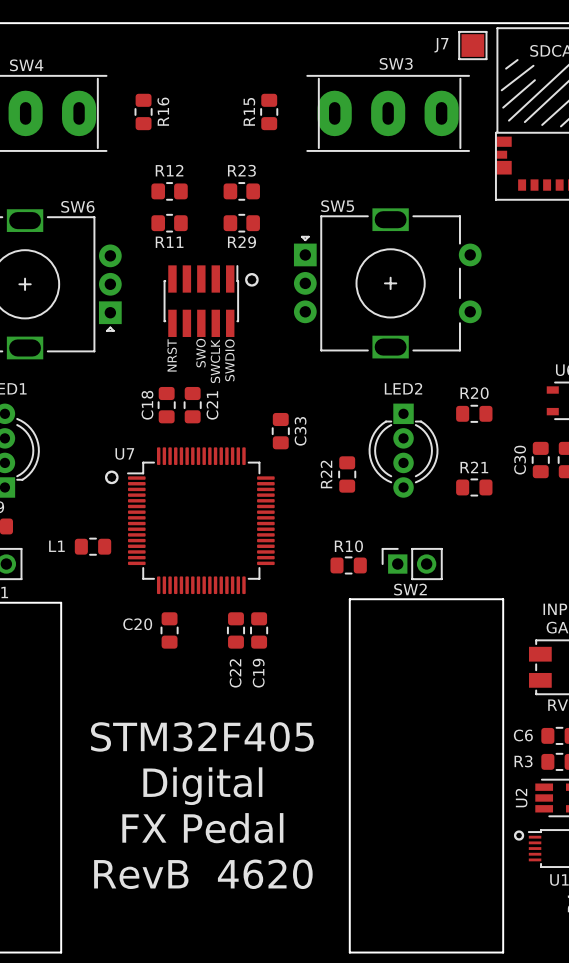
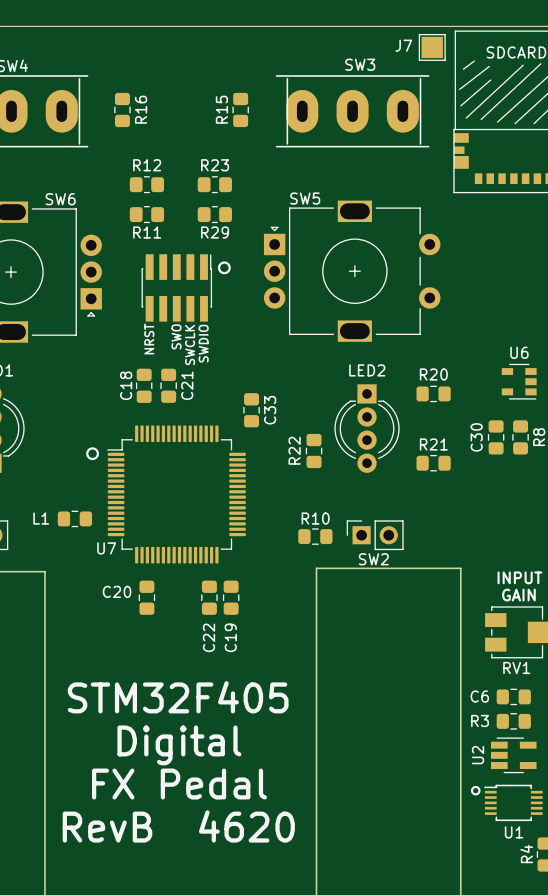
U7 name position: U7 (124, 453) -> U7 (106, 548)

